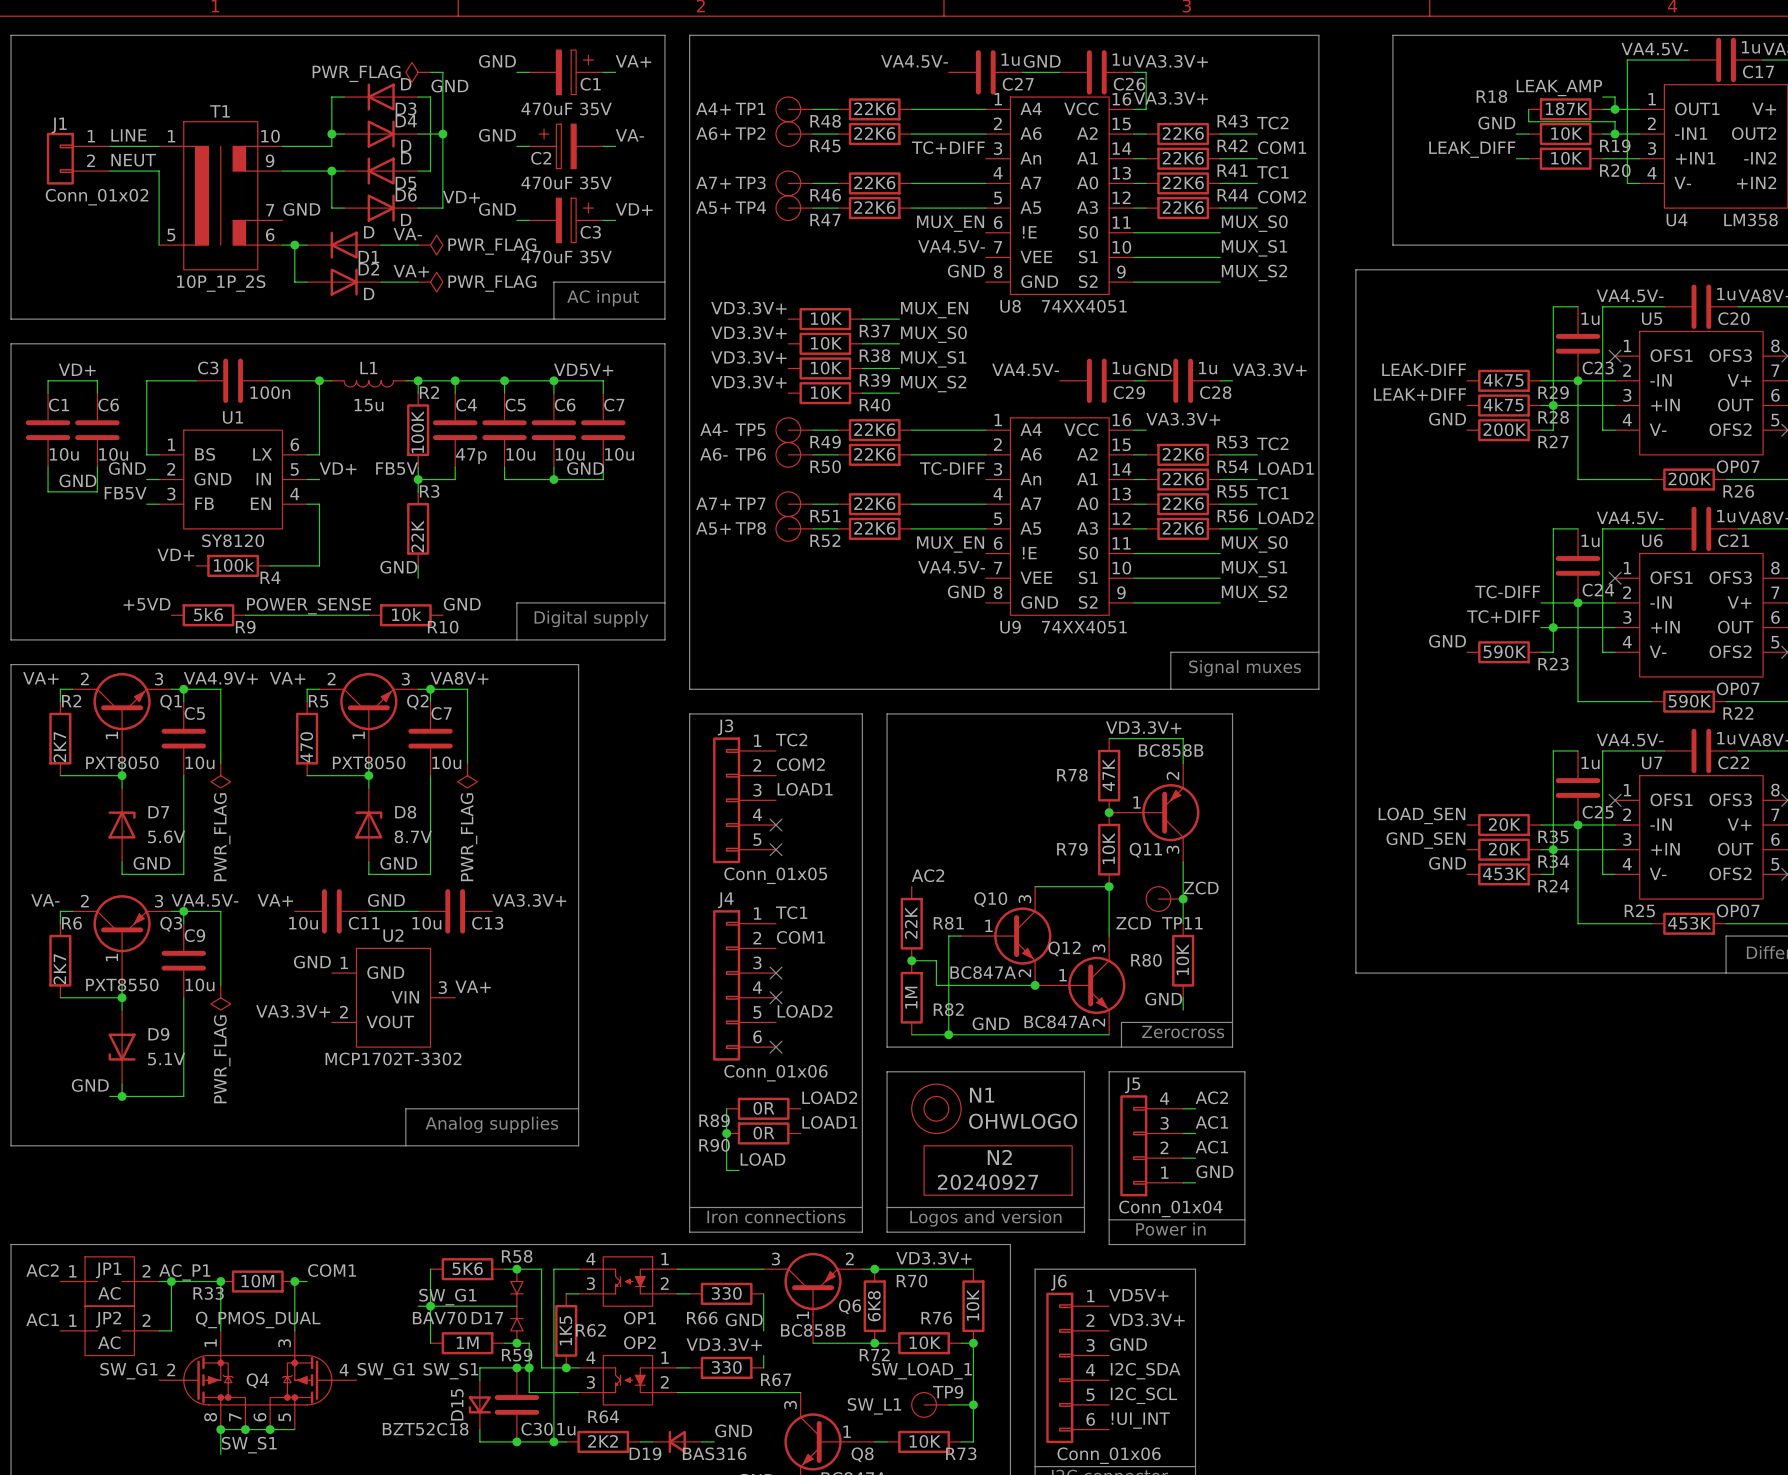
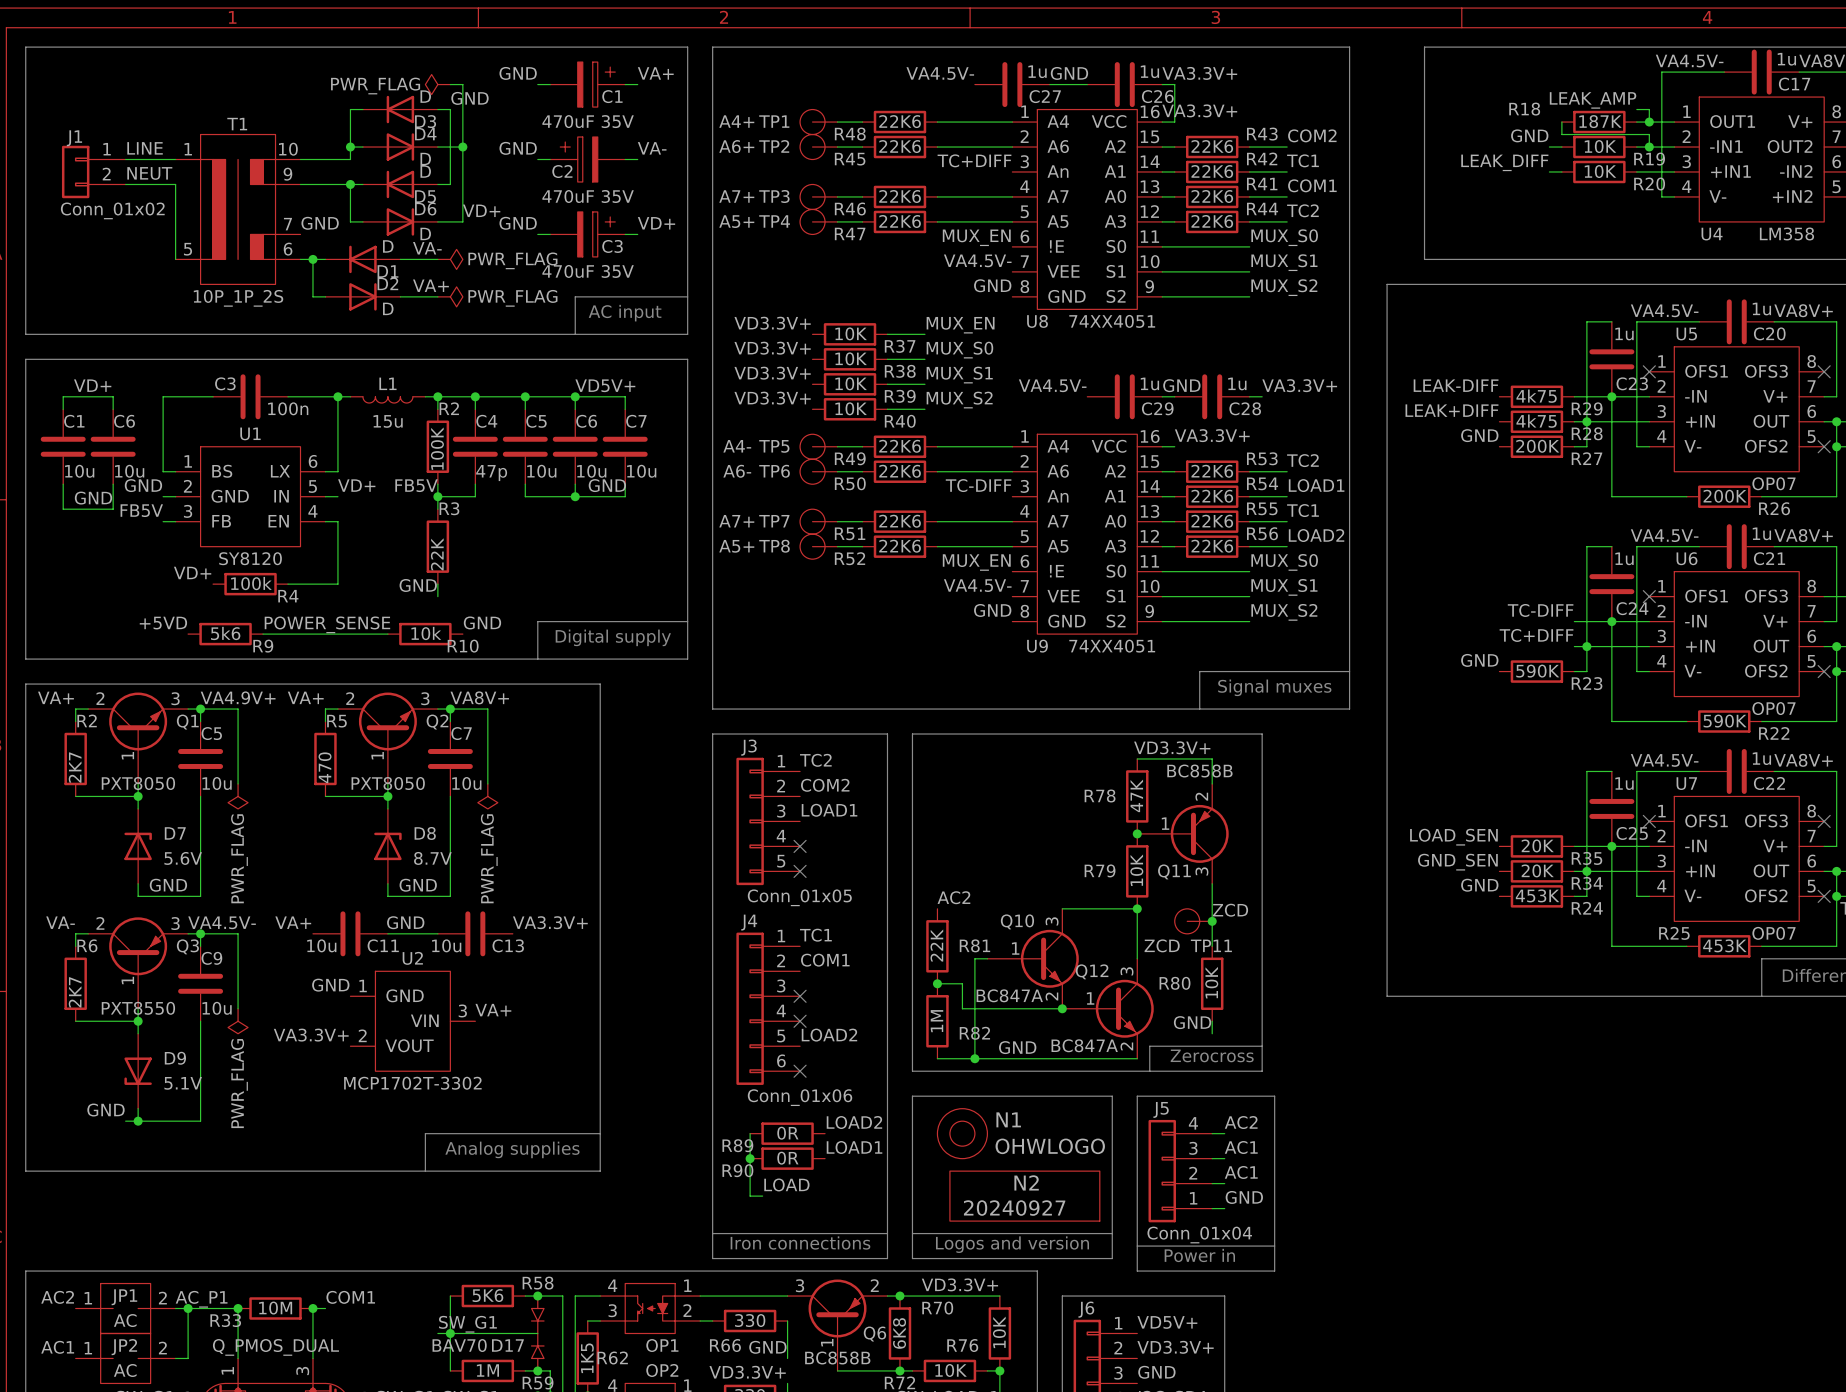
label: TC2 (1272, 123) -> COM2 (1312, 135)
label: COM1 (1282, 147) -> TC1 (1302, 160)
label: TC1 (1272, 172) -> COM1 (1312, 185)
label: COM2 (1282, 197) -> TC2 (1302, 210)

